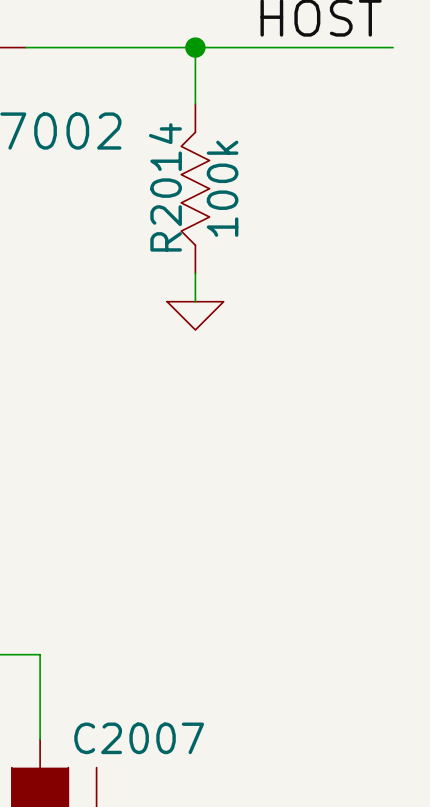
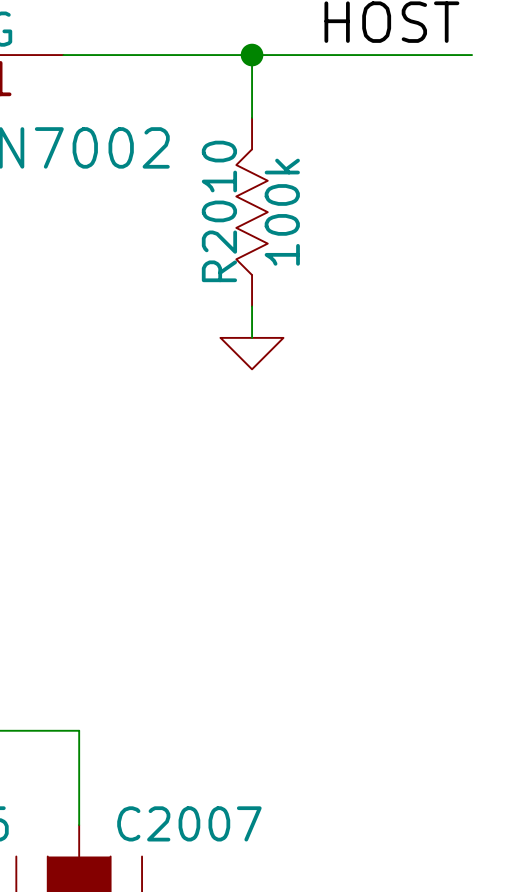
R2014 name: R2014 (165, 187) -> R2010 (219, 211)

